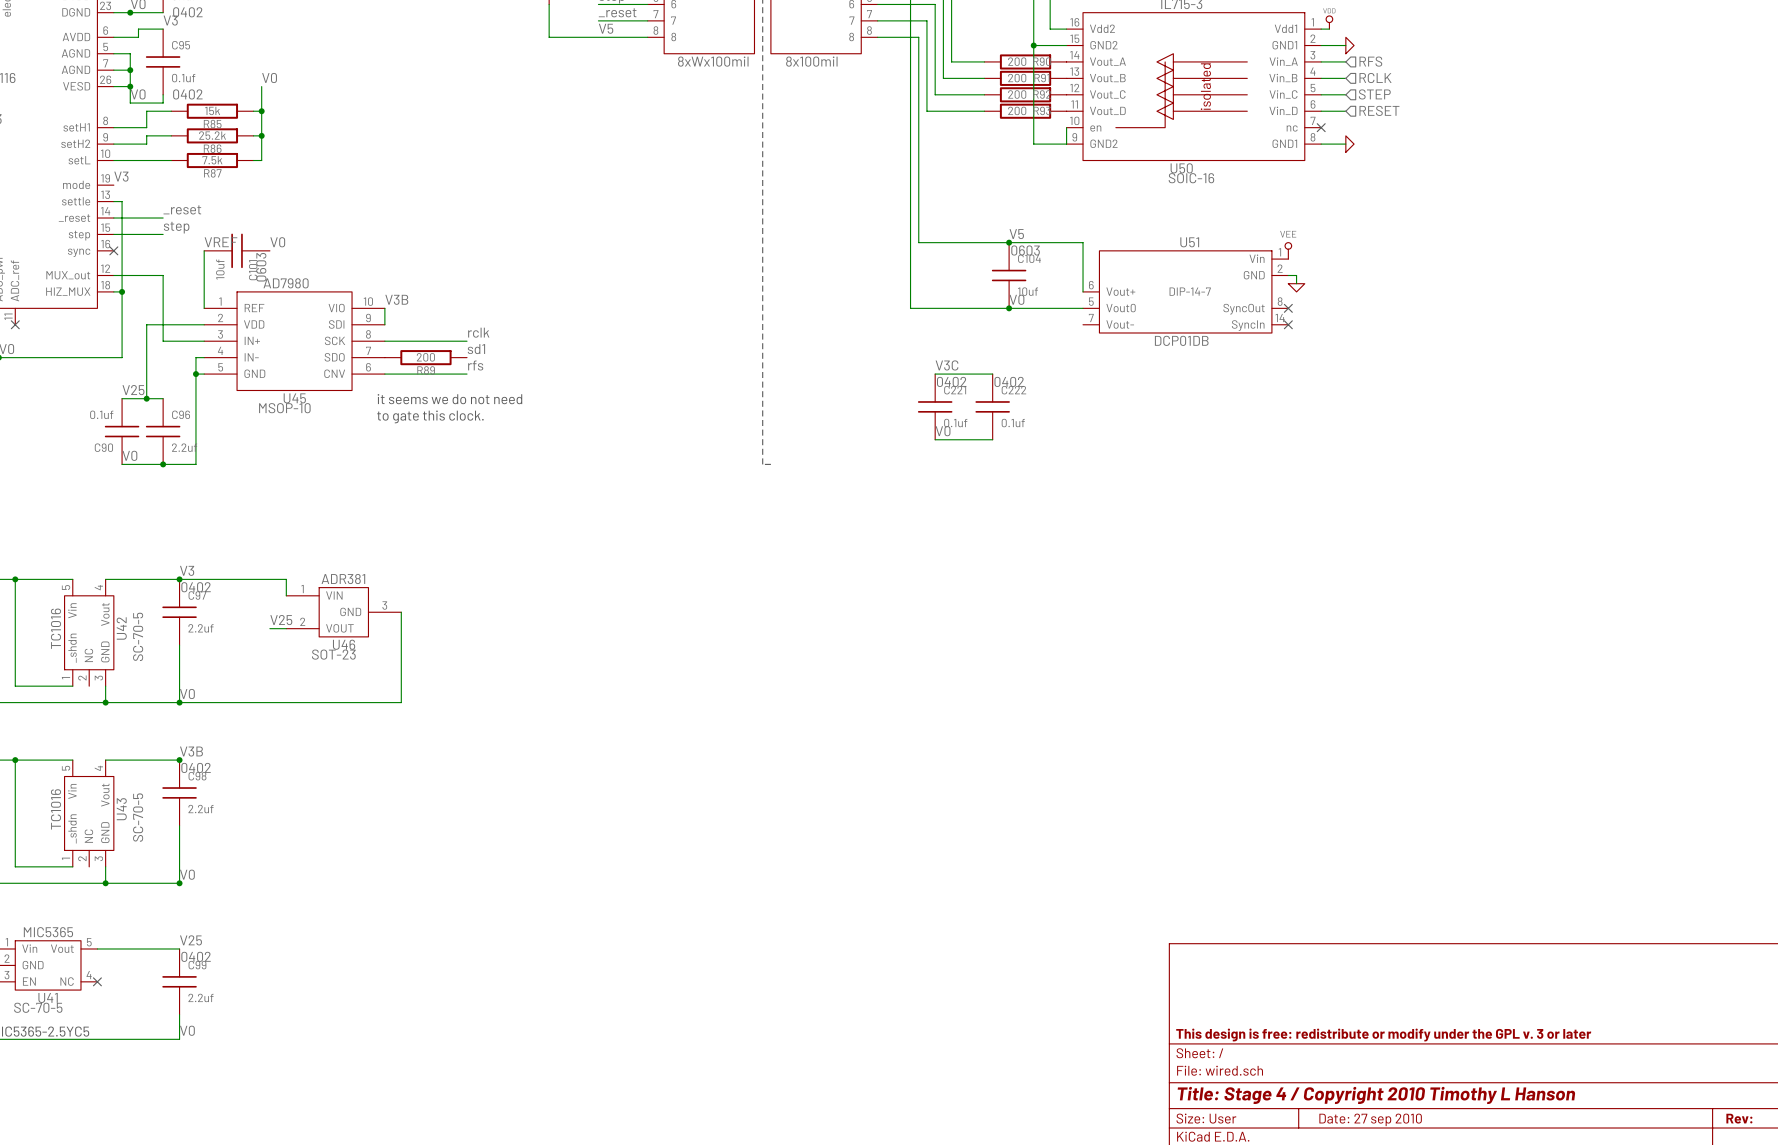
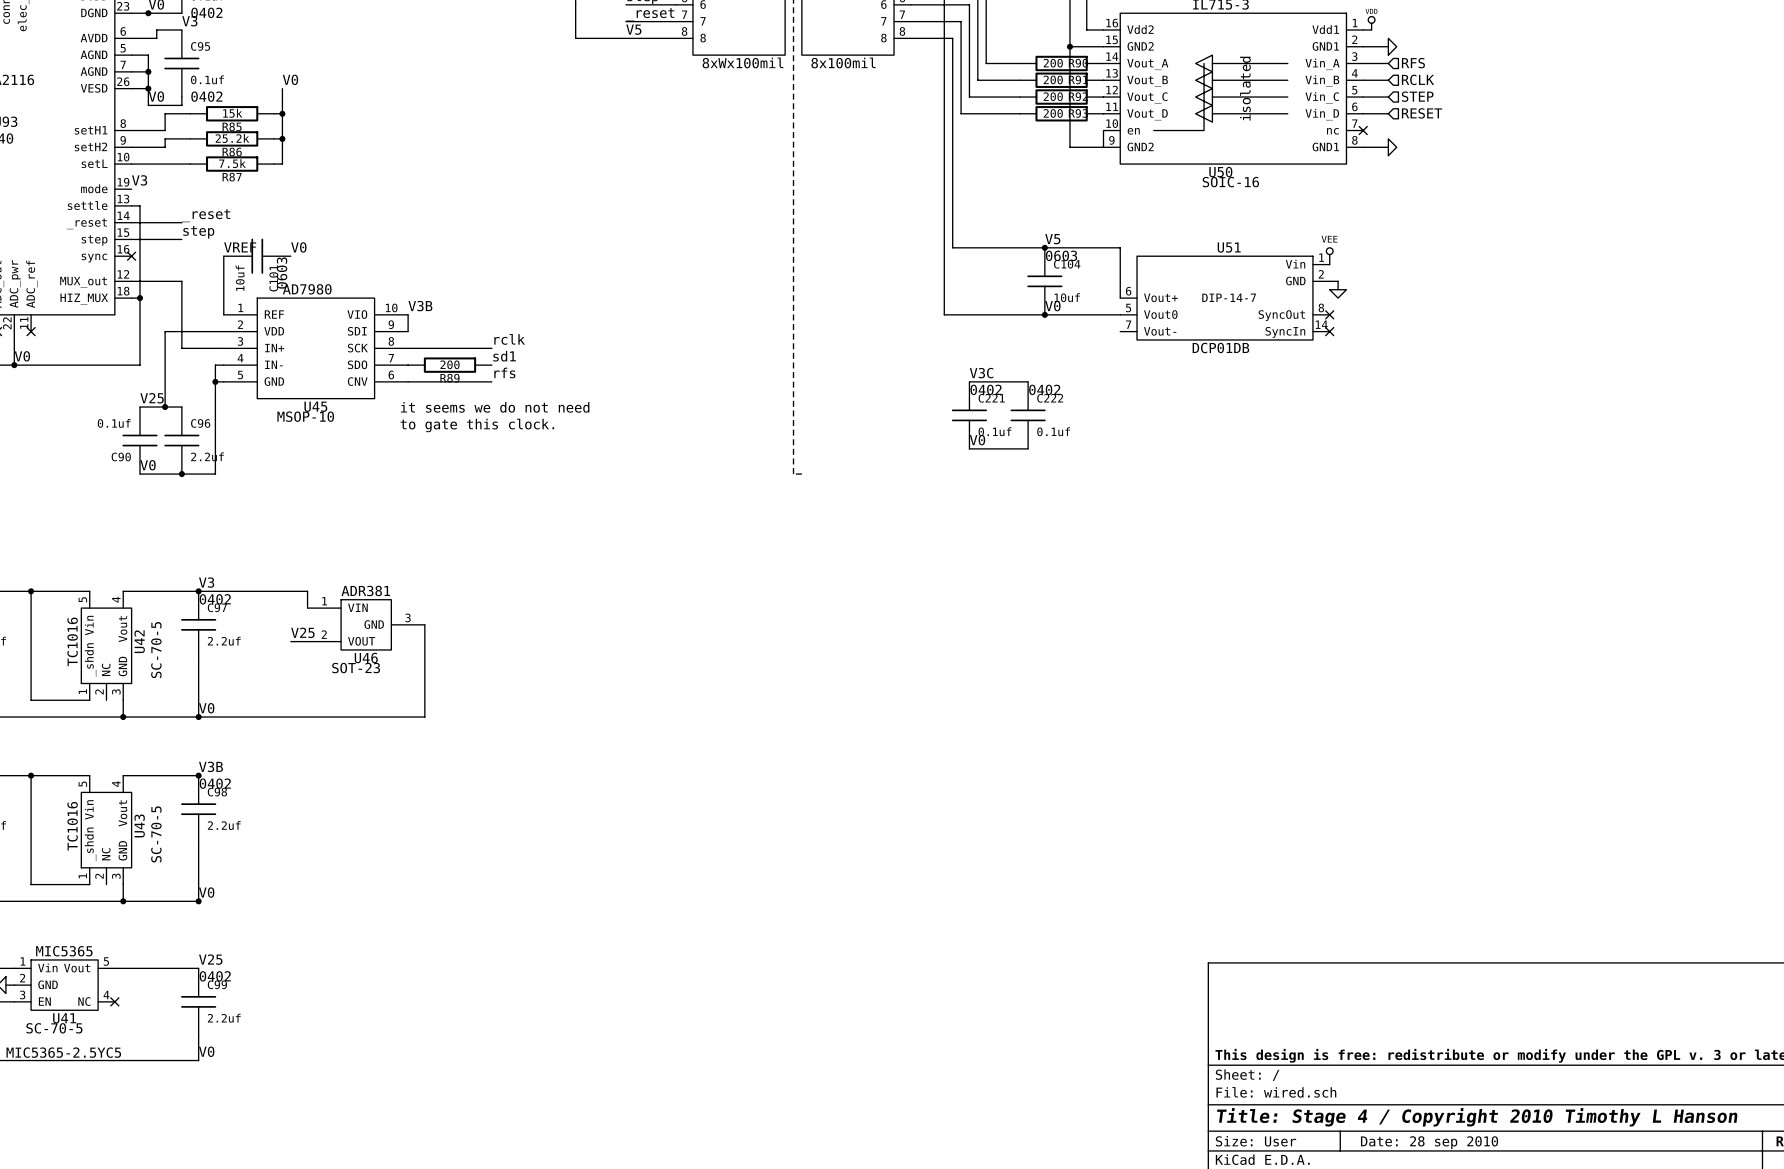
title block: Date: 27 sep 2010 (1370, 1119) -> Date: 28 sep 2010 (1429, 1142)

